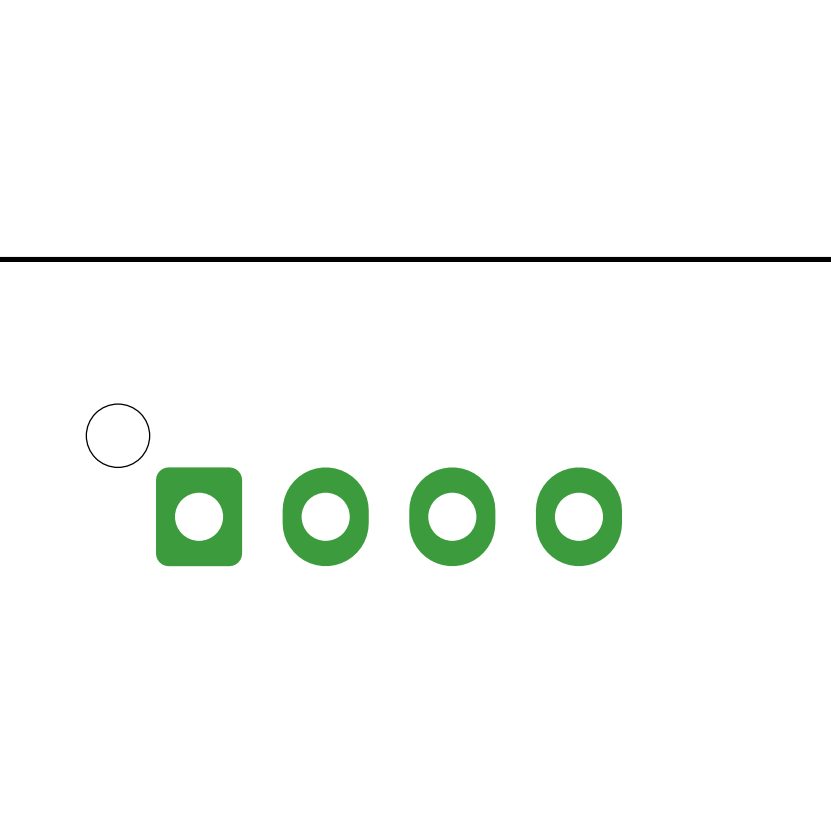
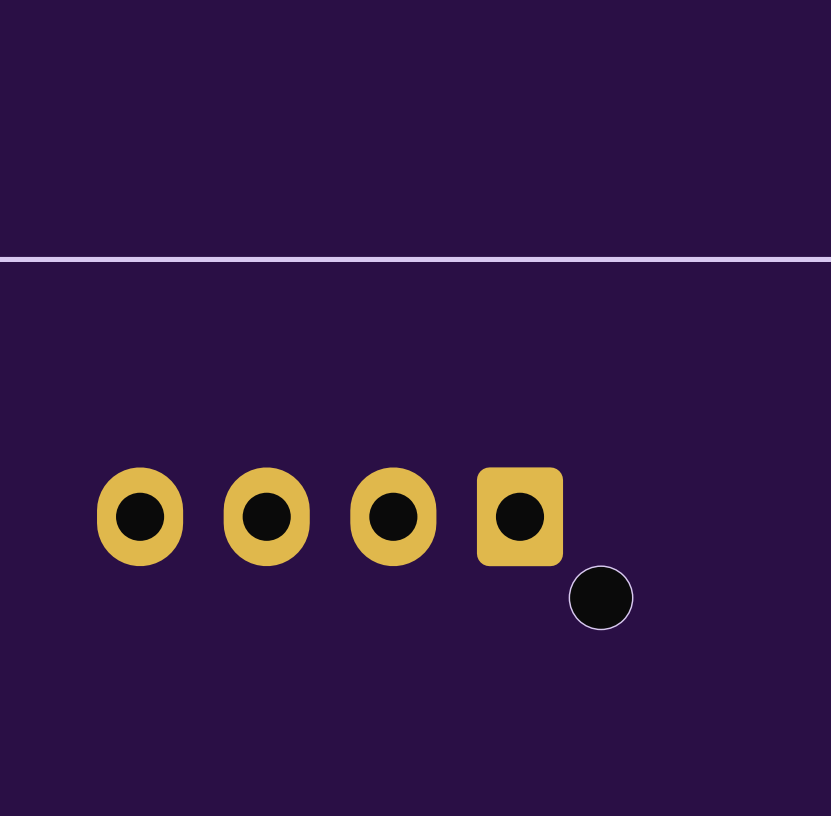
part rotation: 0° (354, 485) -> 180° (364, 548)

